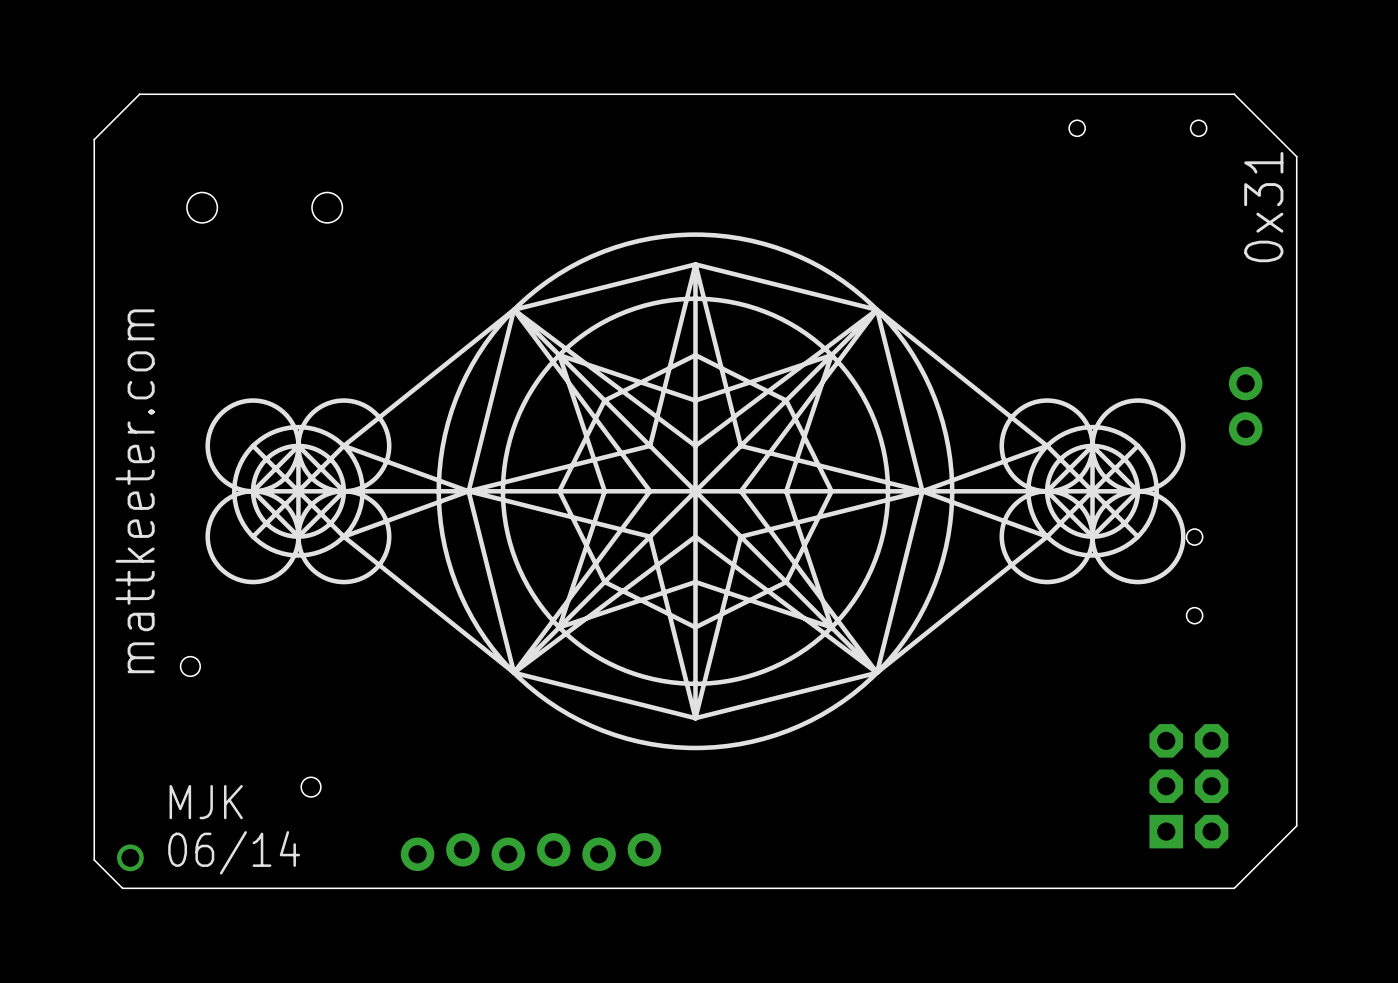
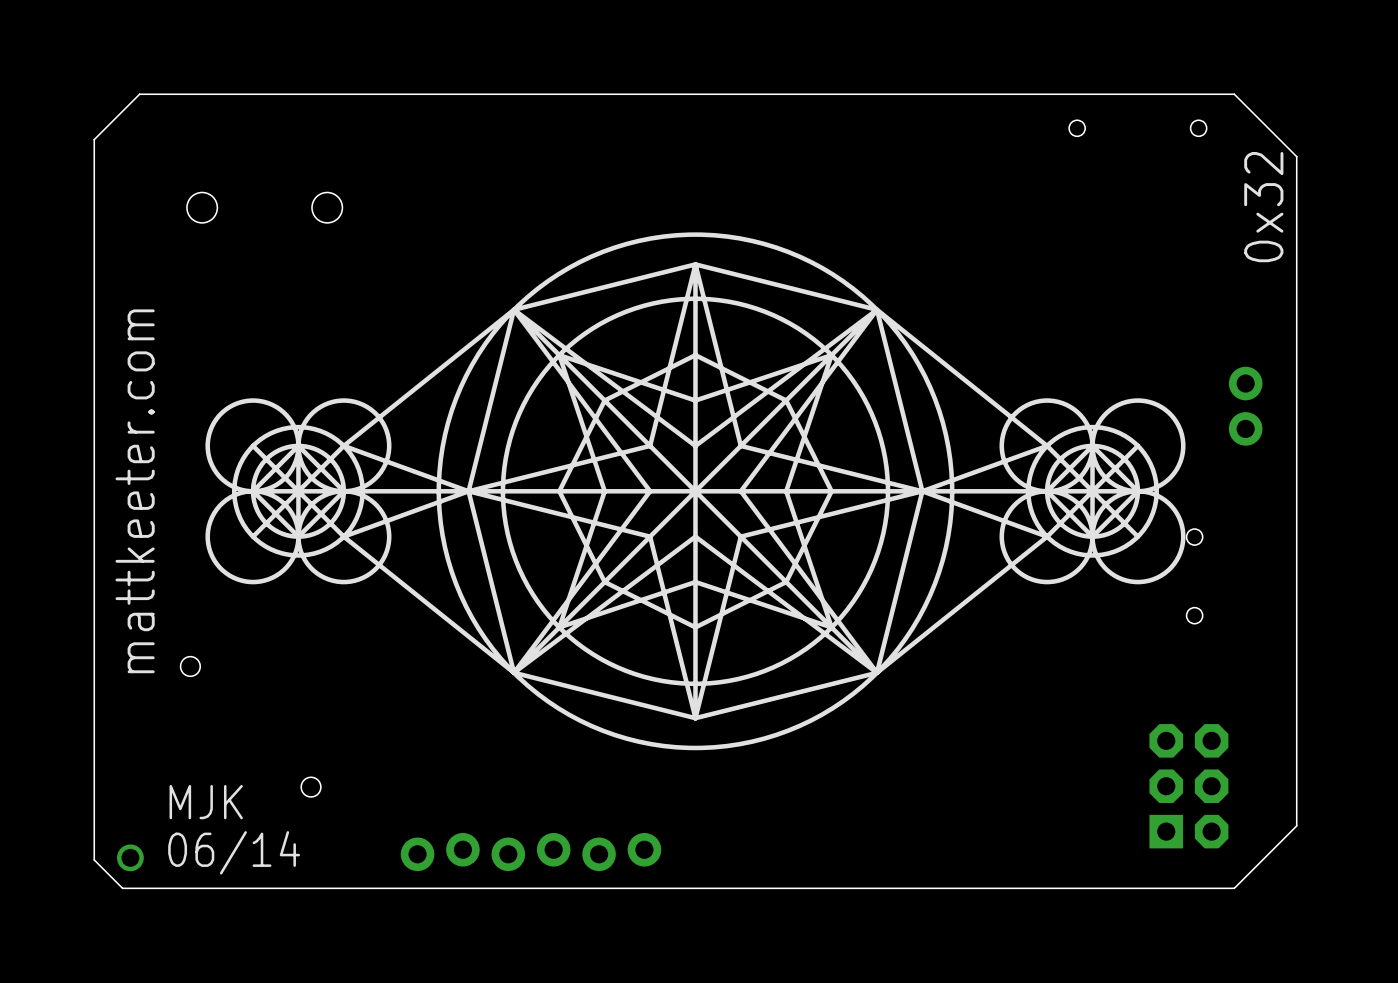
text: 0x31 (1263, 207) -> 0x32 (1263, 207)

